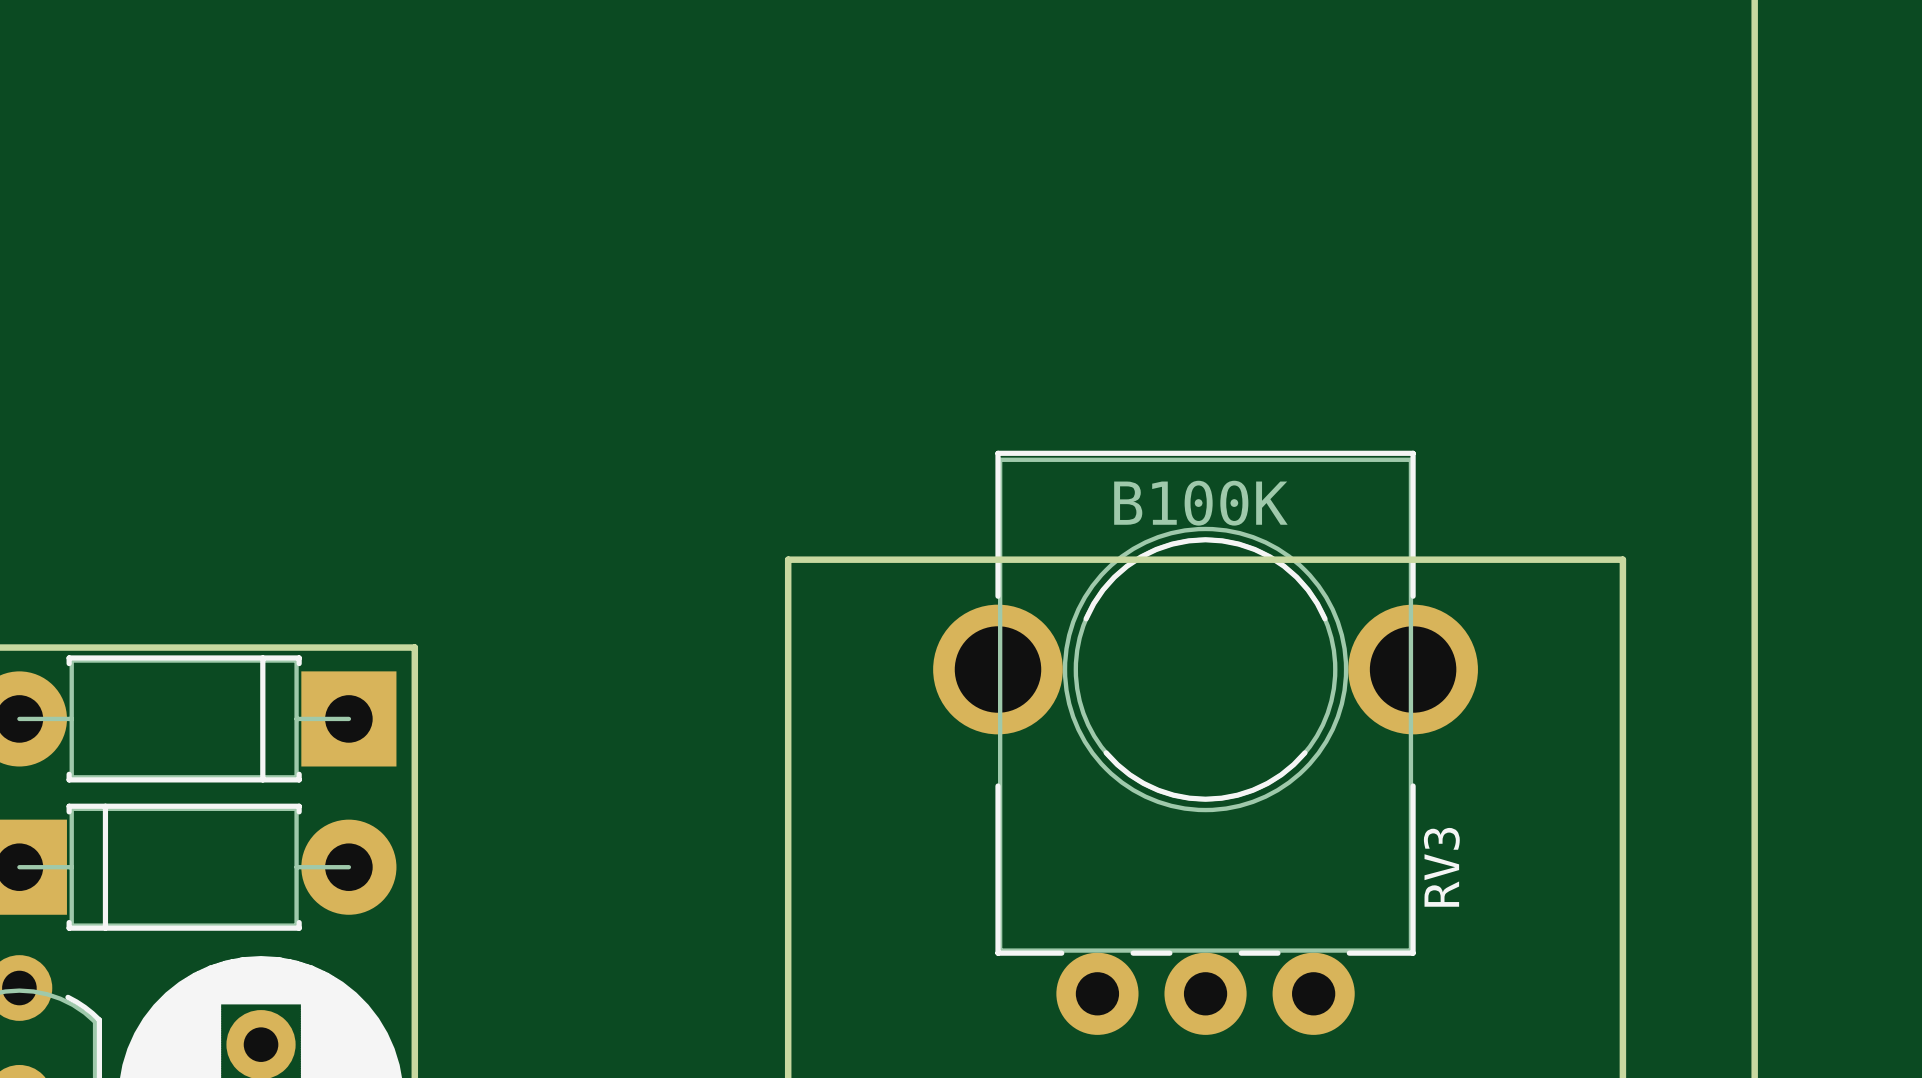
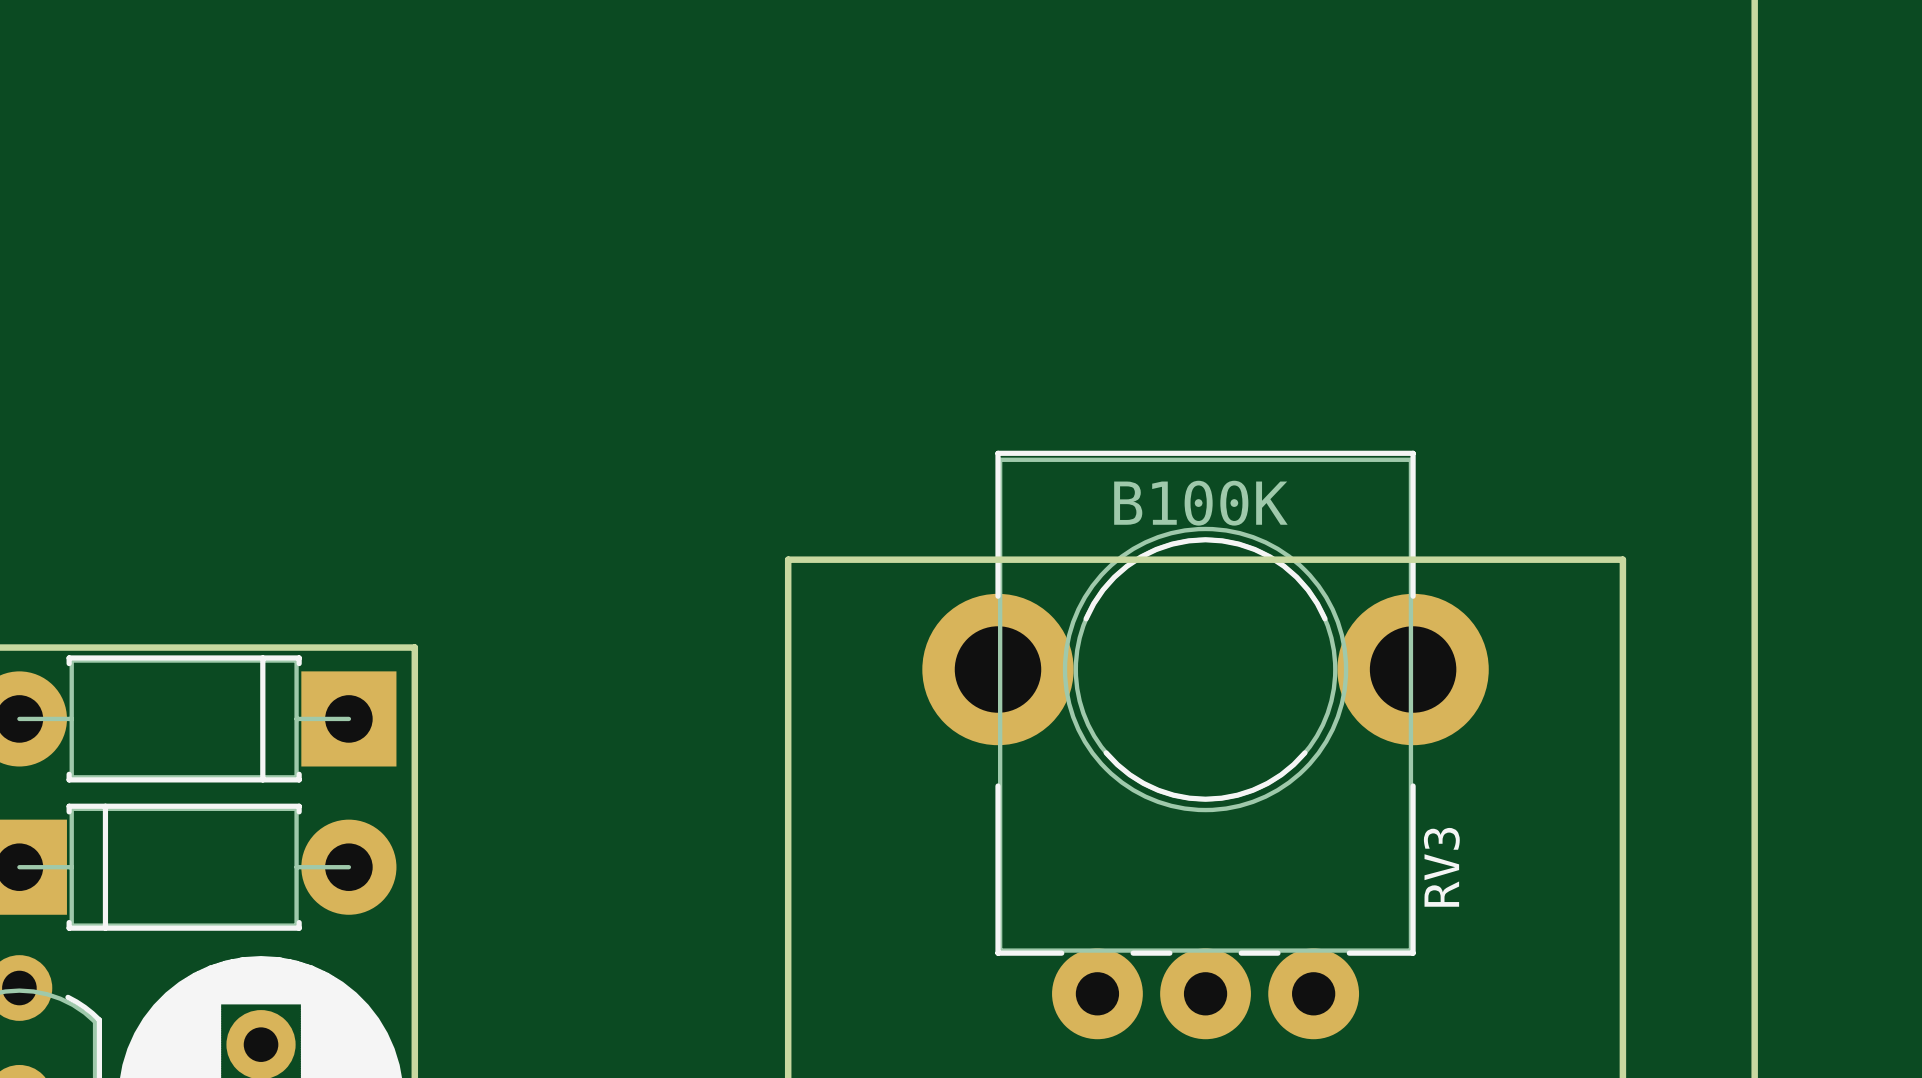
RV3 footprint: [933, 450, 1478, 1035] -> [922, 450, 1489, 1040]

